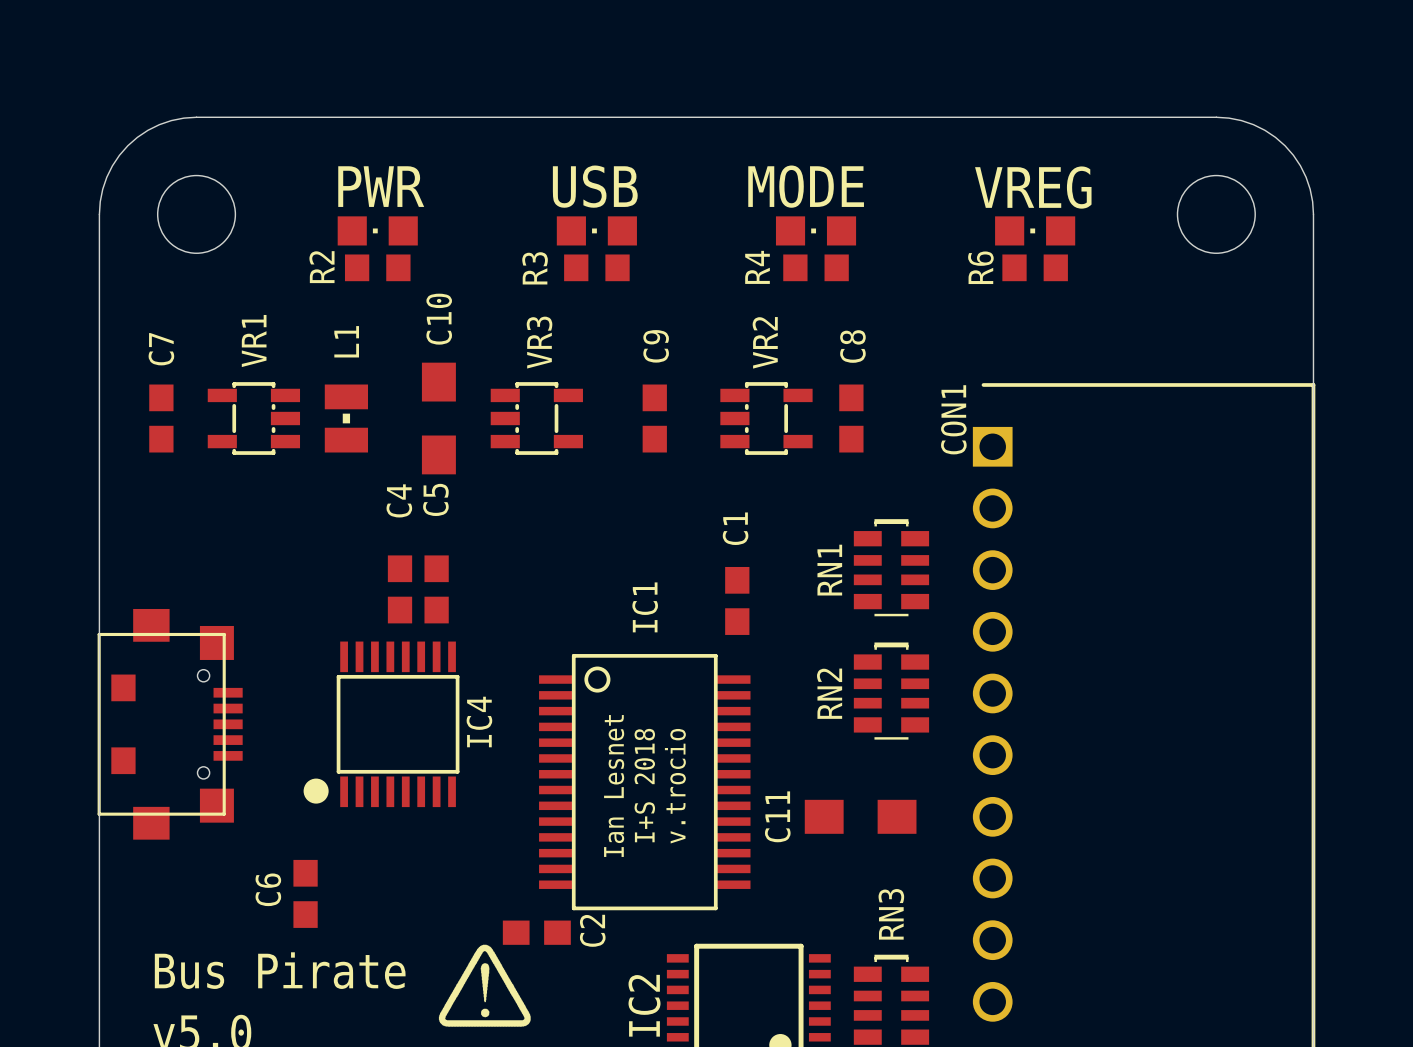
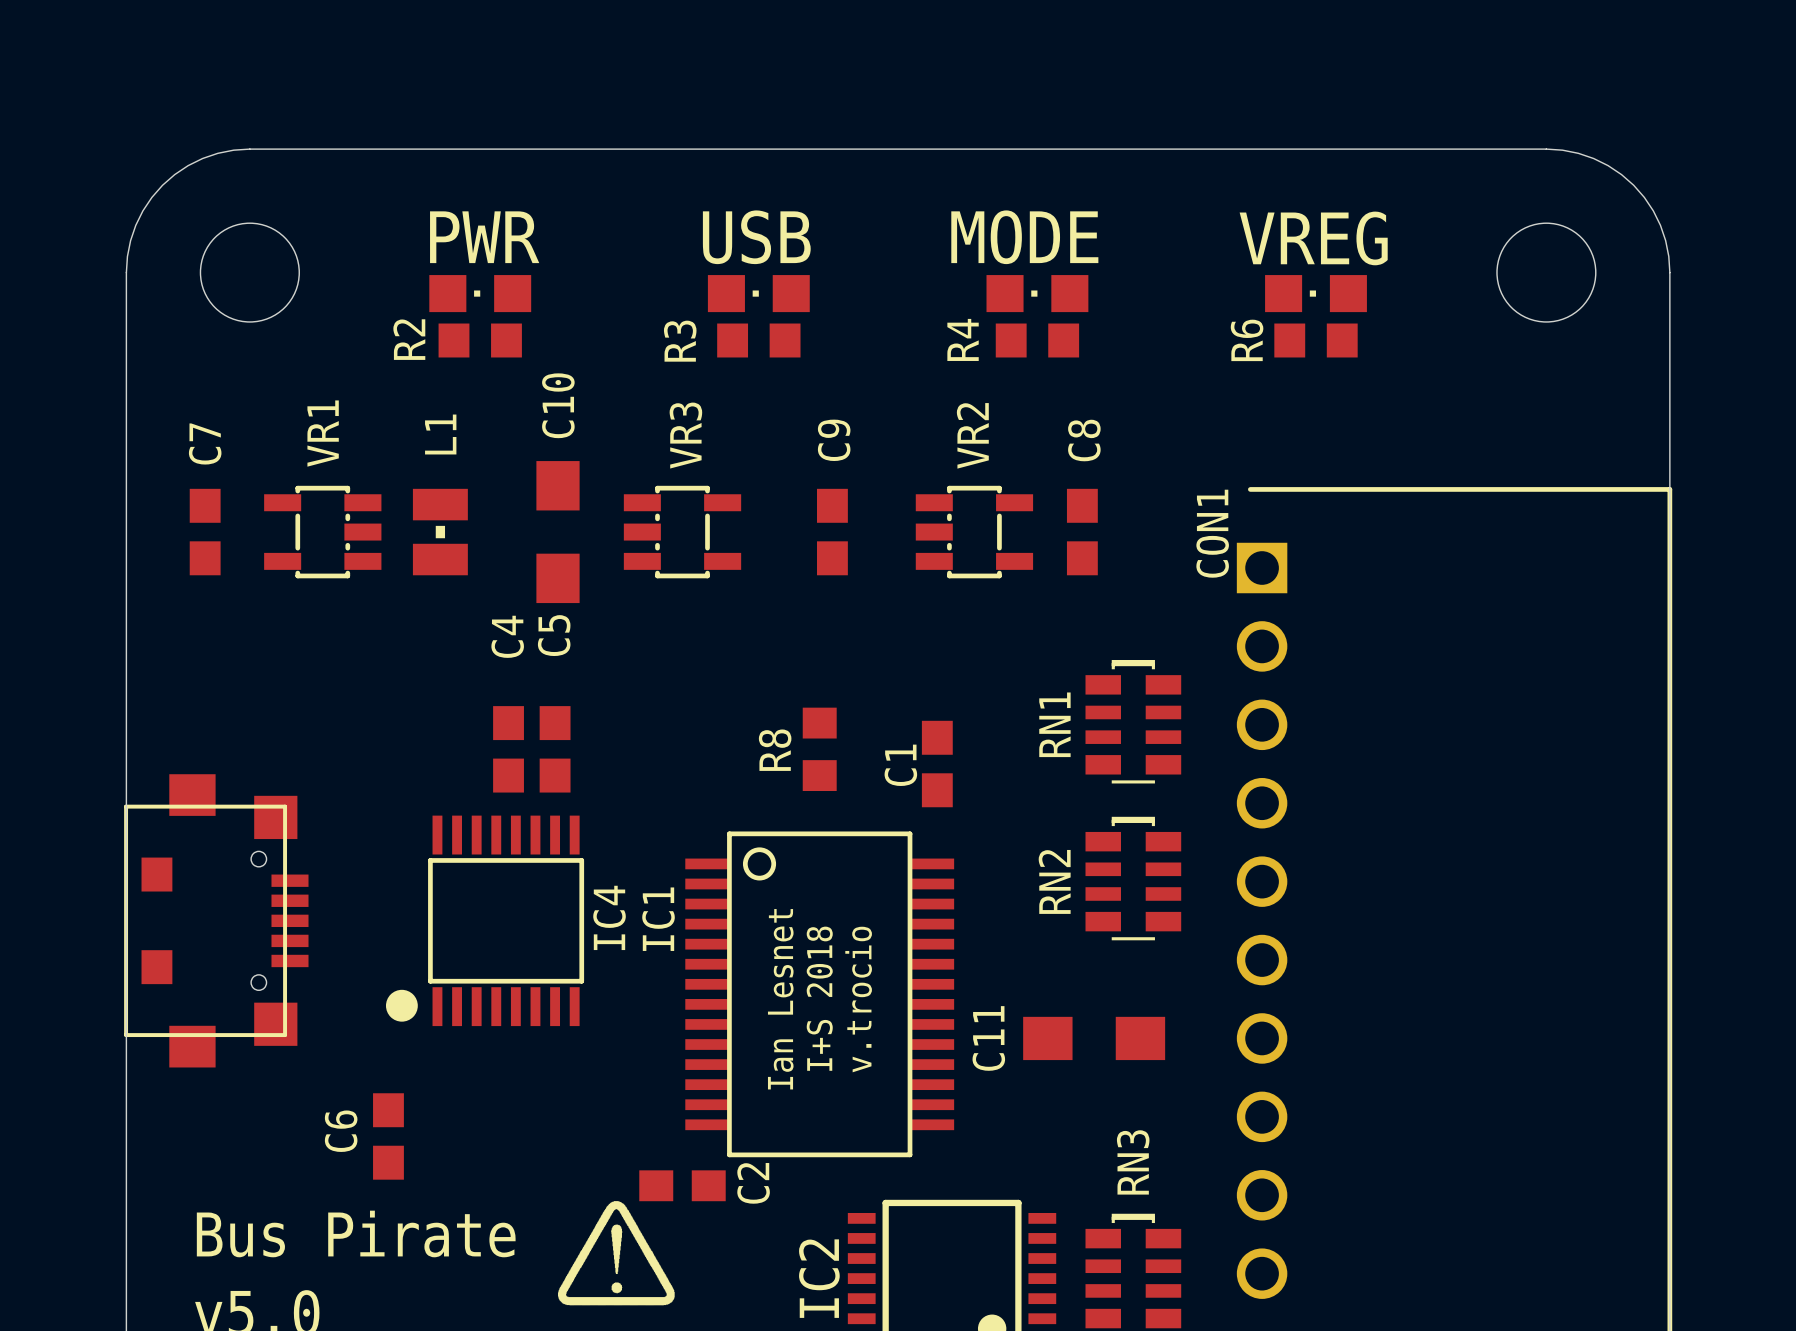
C1 name position: C1 (735, 528) -> C1 (900, 765)
R8: none -> (819, 749)
IC1 name position: IC1 (645, 607) -> IC1 (658, 919)

